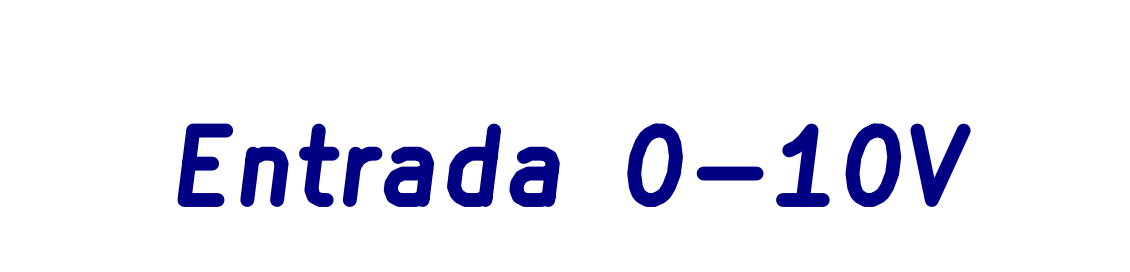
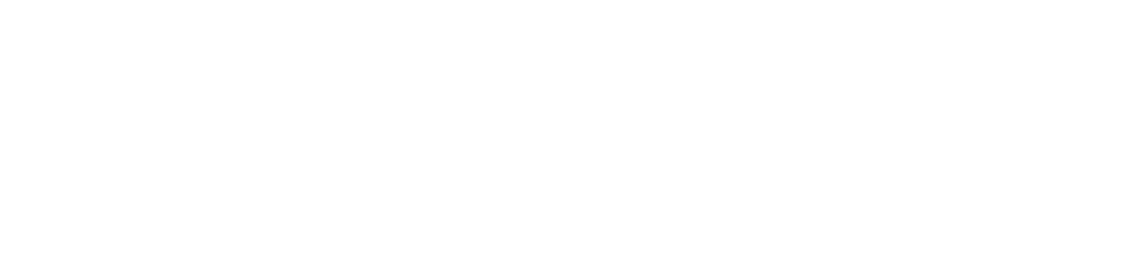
text: Entrada 0-10V (574, 165) -> none

